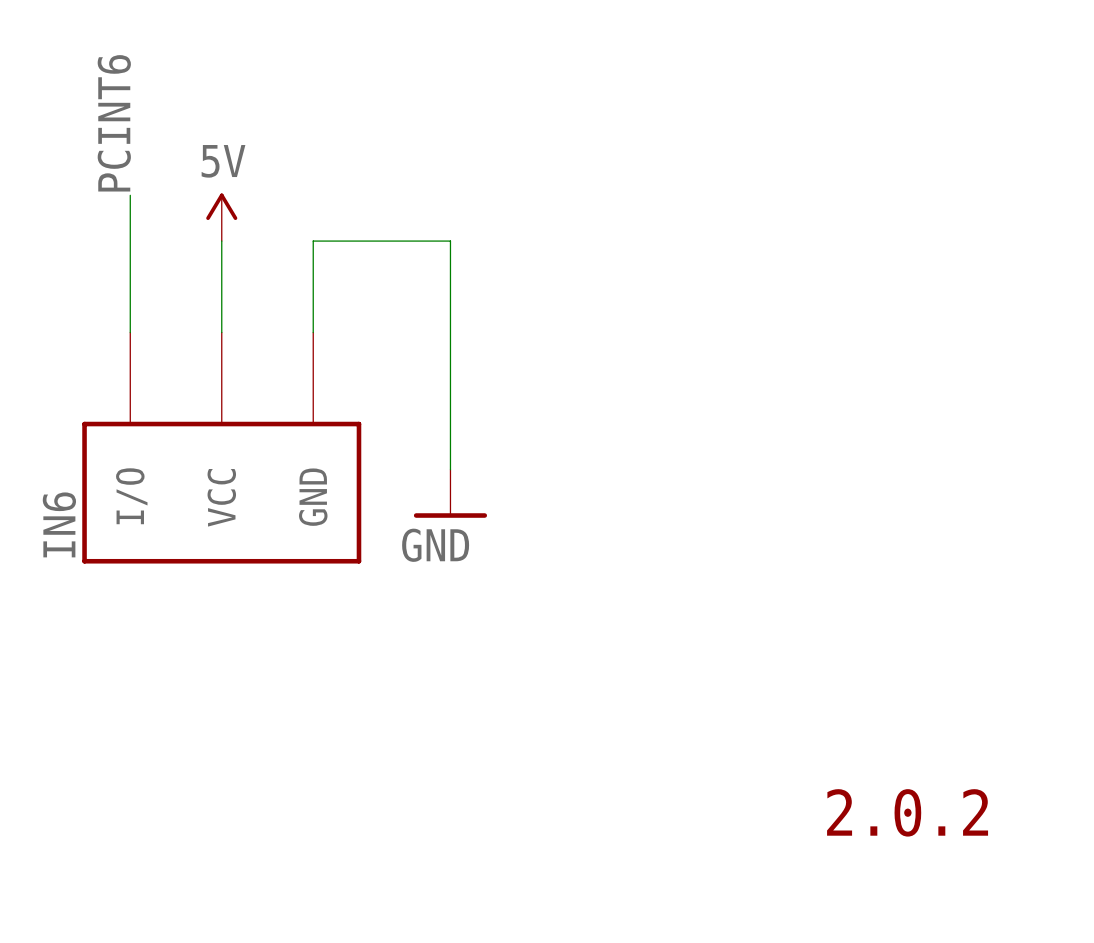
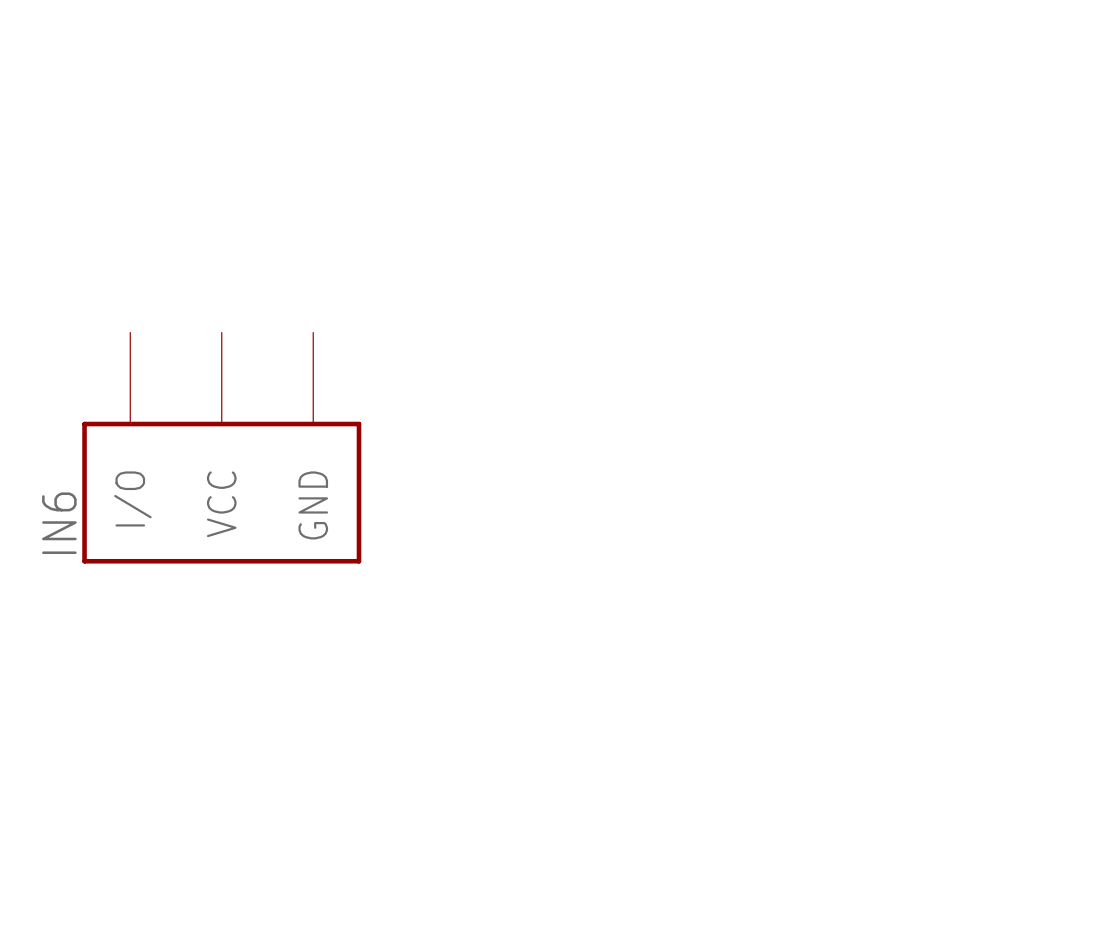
label: PCINT6 (114, 123) -> none
wire: (130, 195) (130, 332) -> none
power symbol: 5V (221, 217) -> none
wire: (221, 241) (221, 332) -> none
wire: (313, 332) (313, 241) (450, 241) (450, 469) -> none
power symbol: GND (450, 493) -> none
text: 2.0.2 (907, 812) -> none

